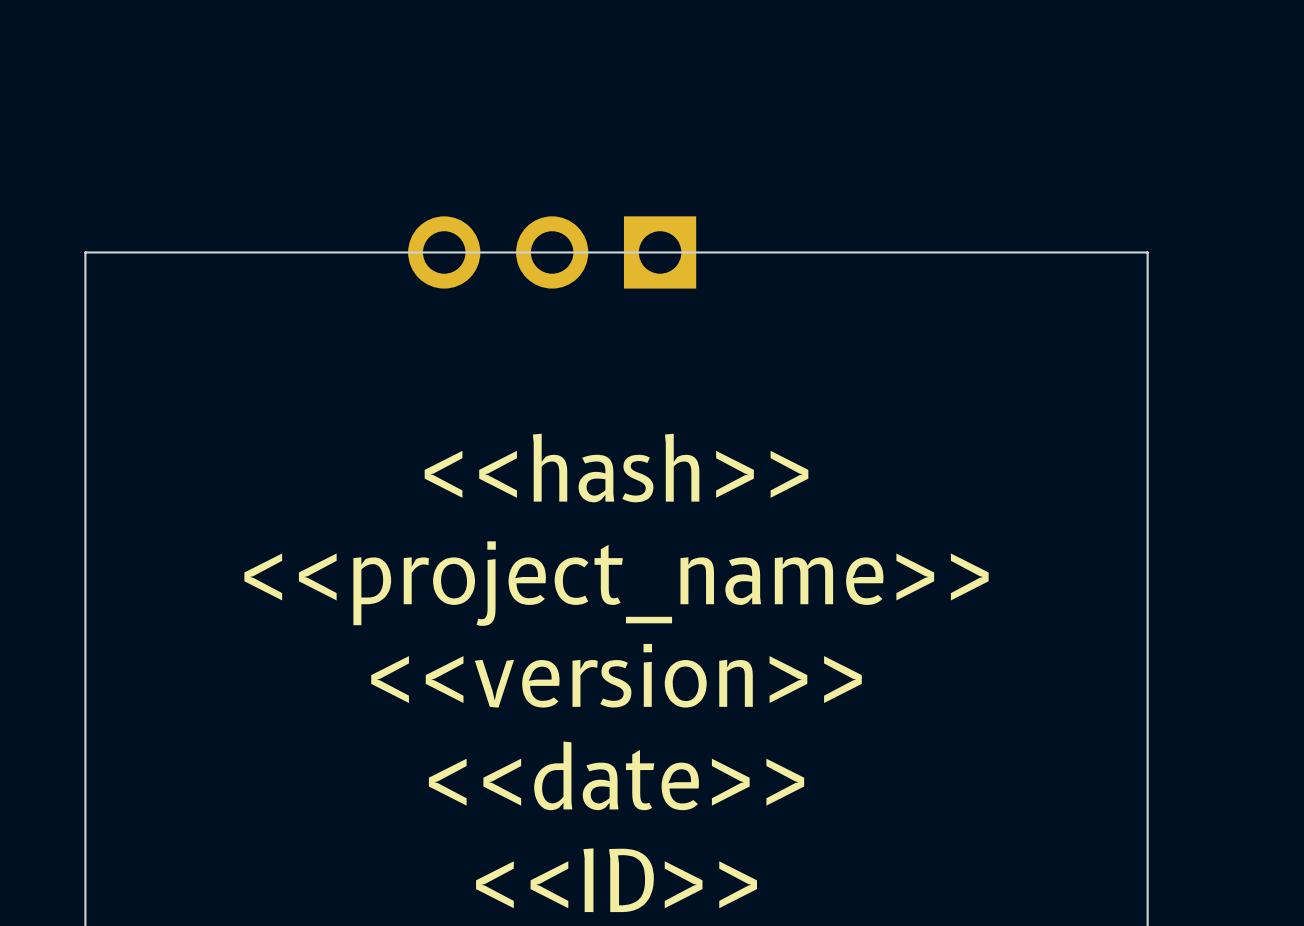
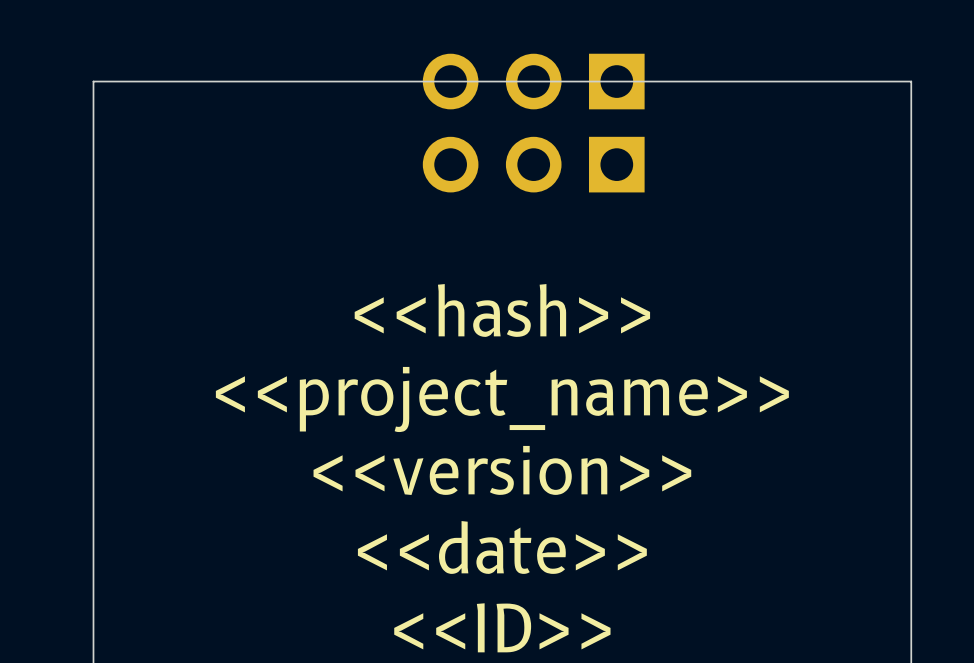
part: none -> (533, 81)
part: (552, 252) -> none
board edge: (1147, 252) (85, 252) -> (911, 144) (911, 81) (93, 81) (93, 144)
part: none -> (533, 164)

